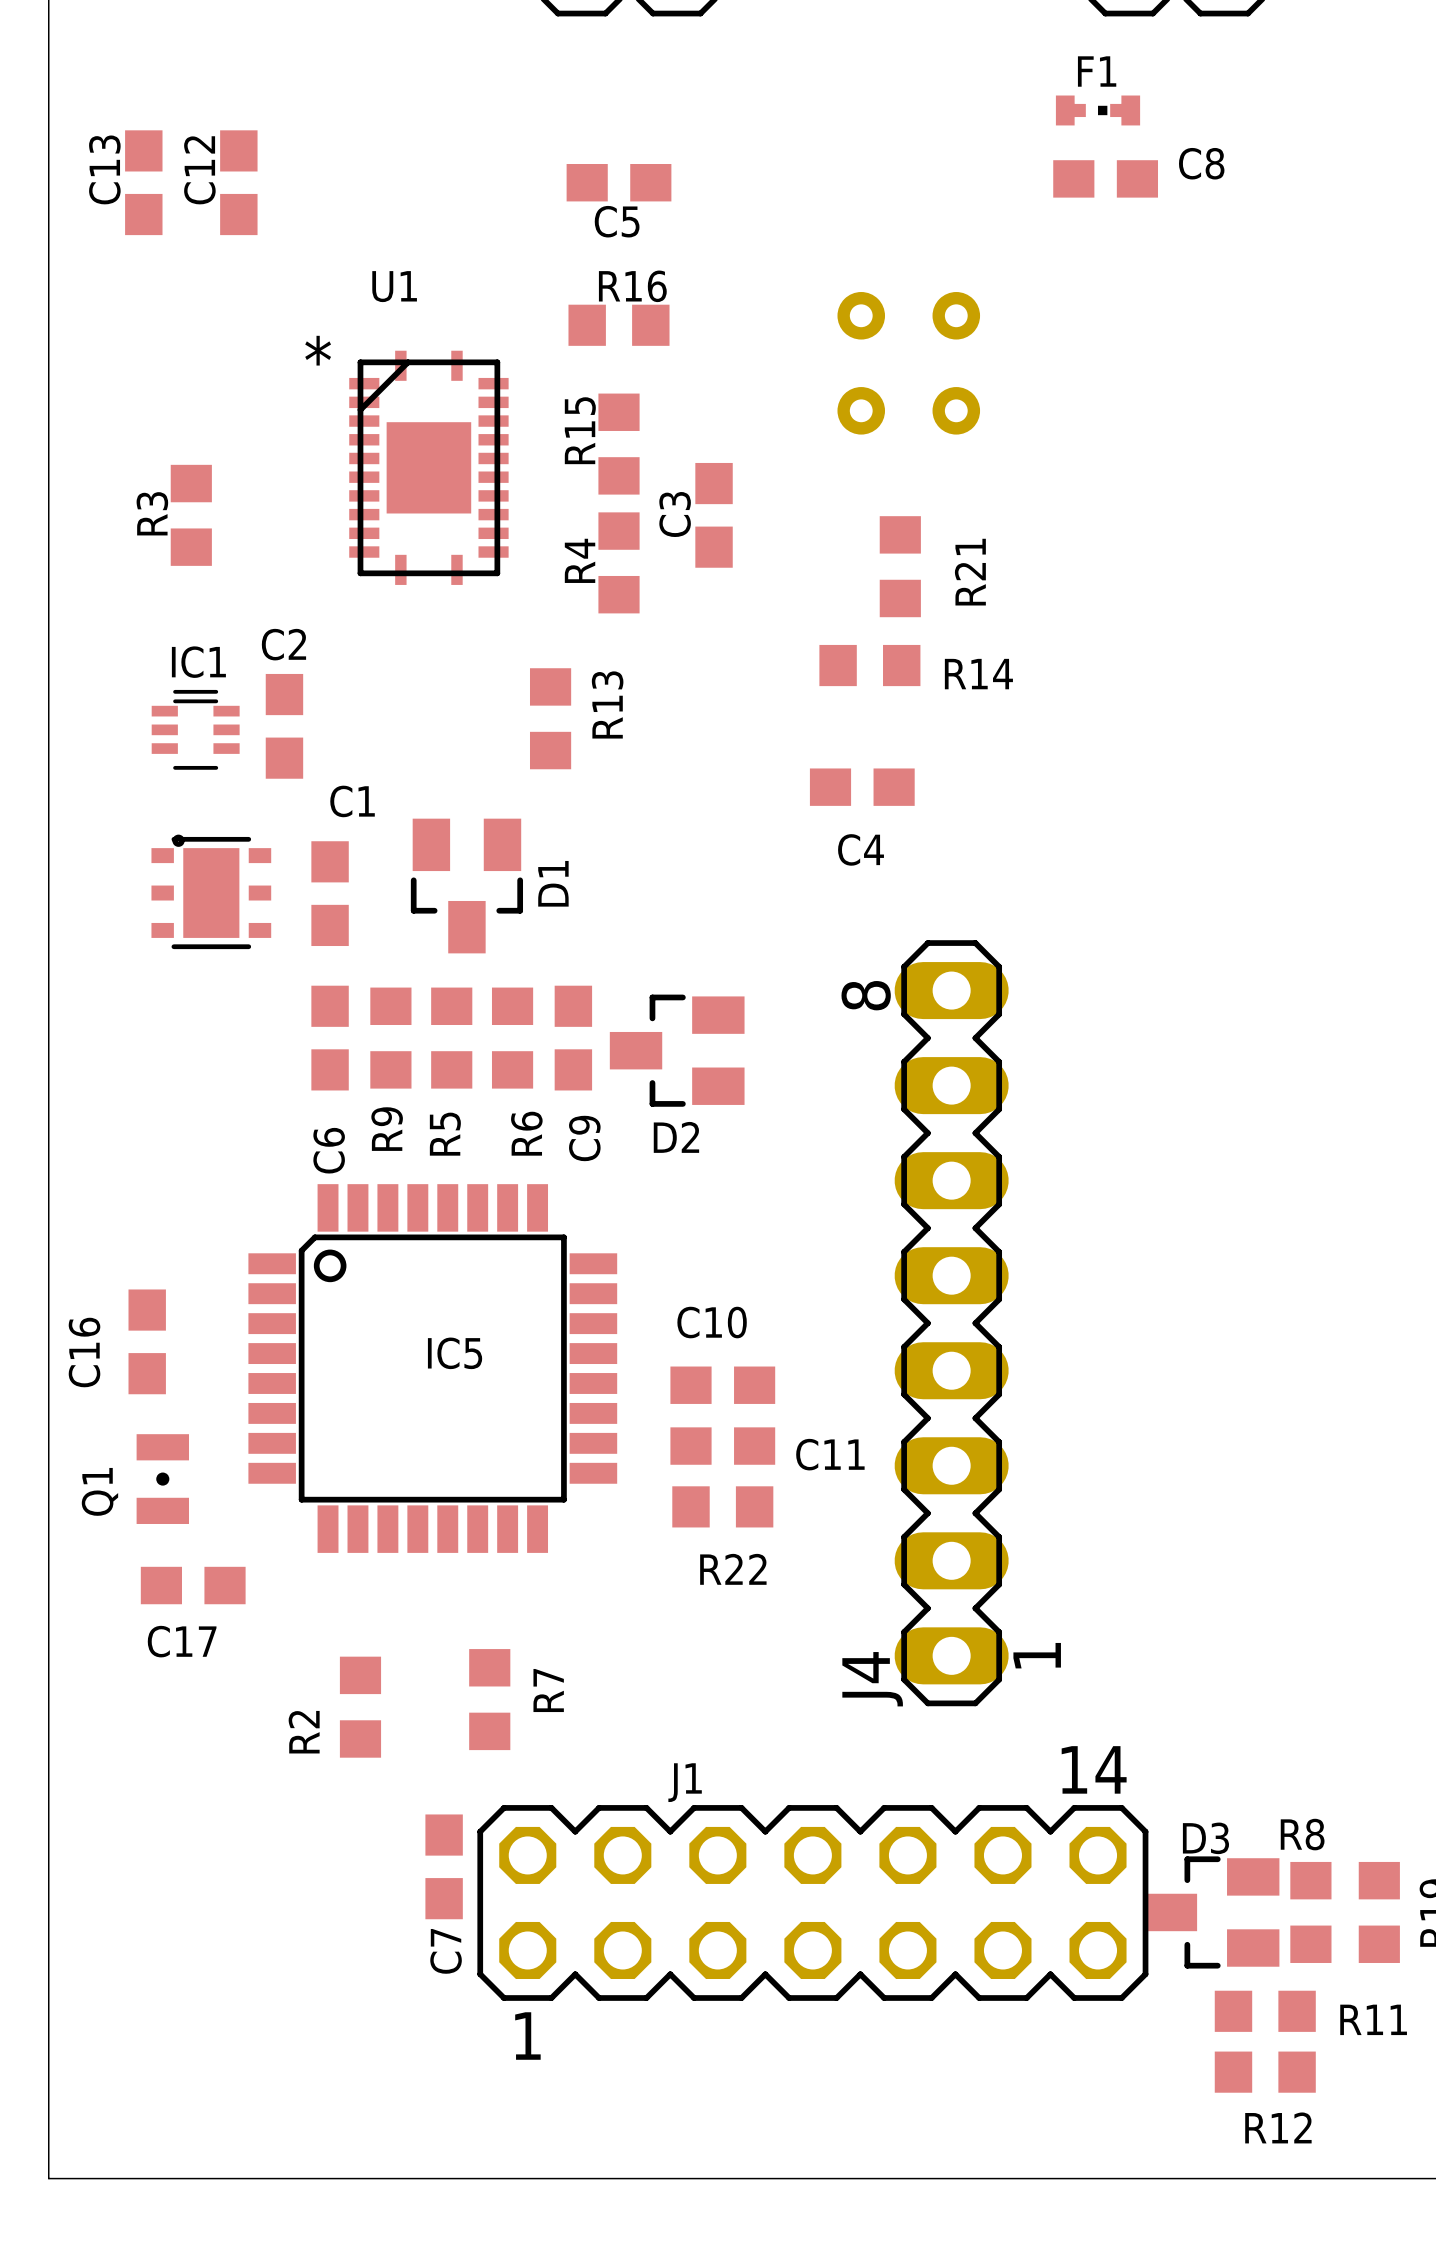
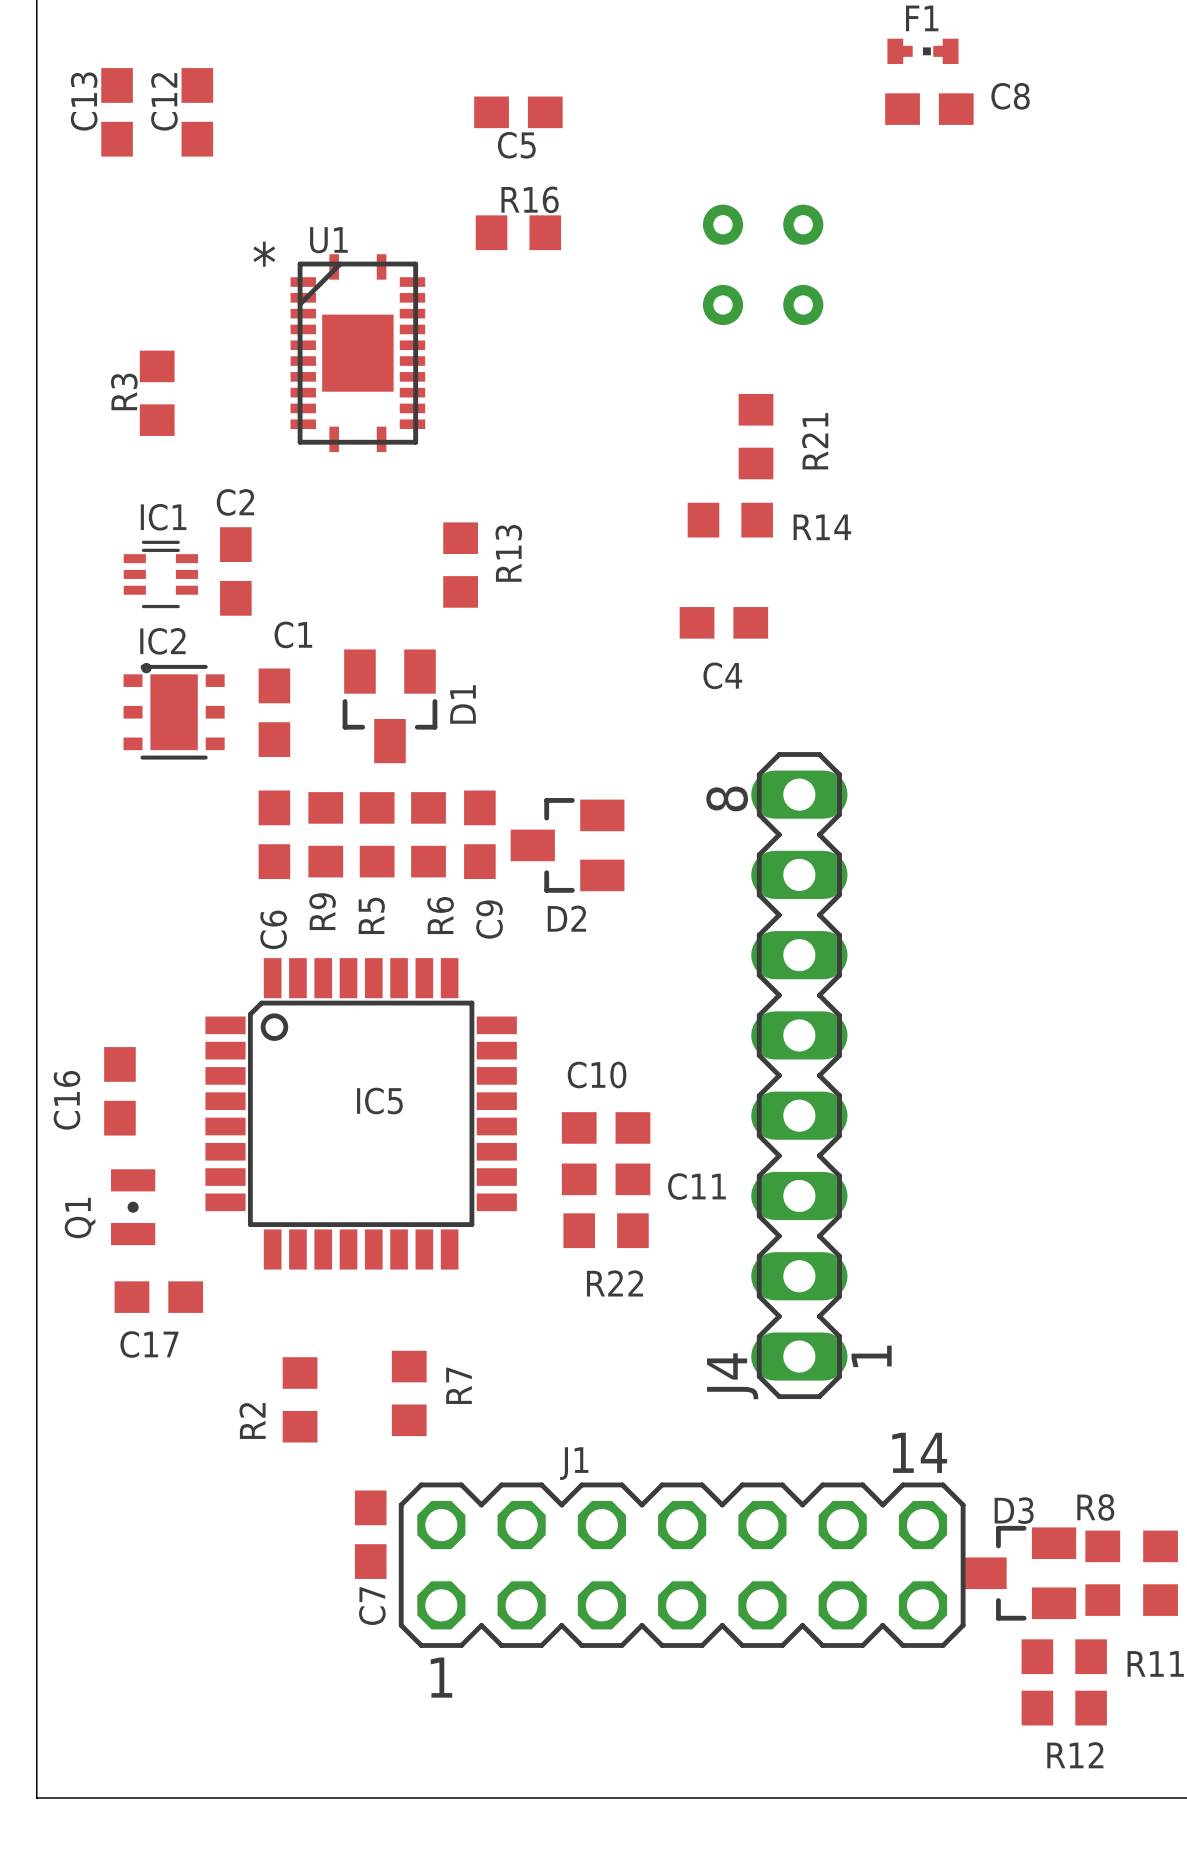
U1 name position: U1 (394, 286) -> U1 (328, 240)
R15: (619, 444) -> none
C3: (714, 515) -> none
R4: (619, 562) -> none
text: none -> IC2 (162, 641)

